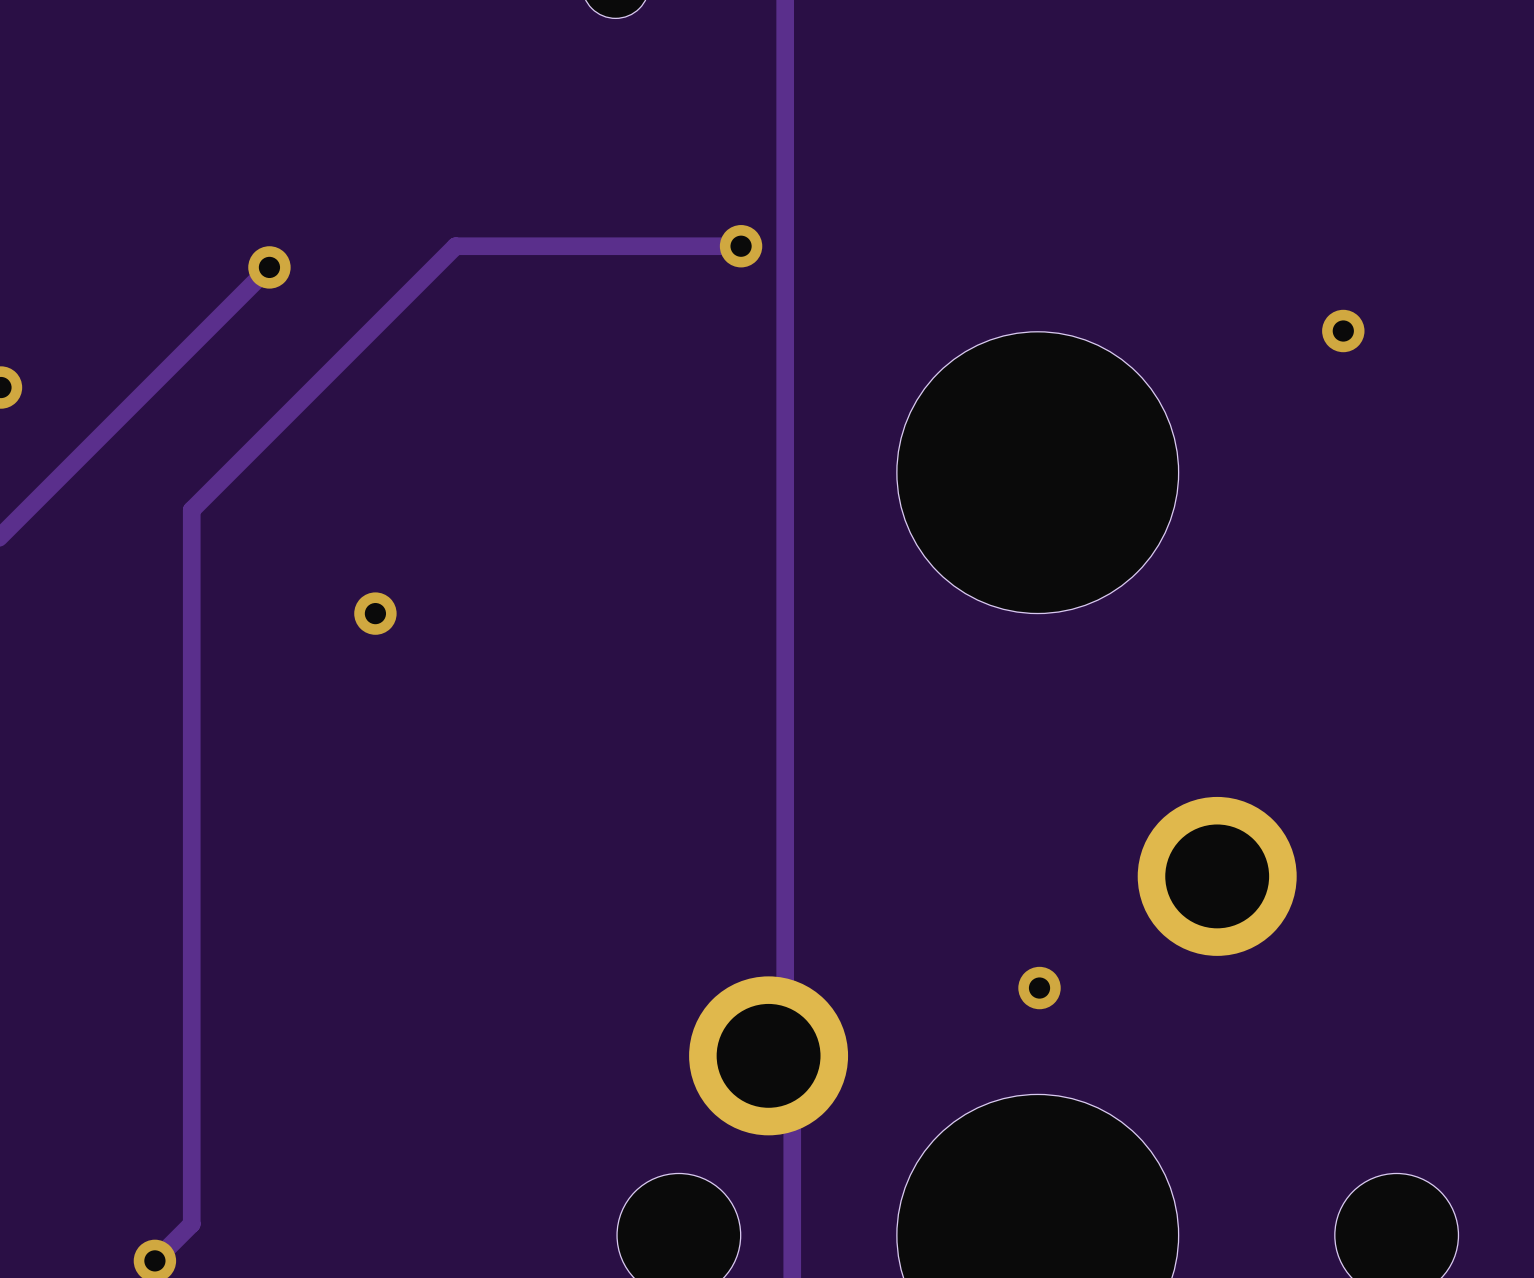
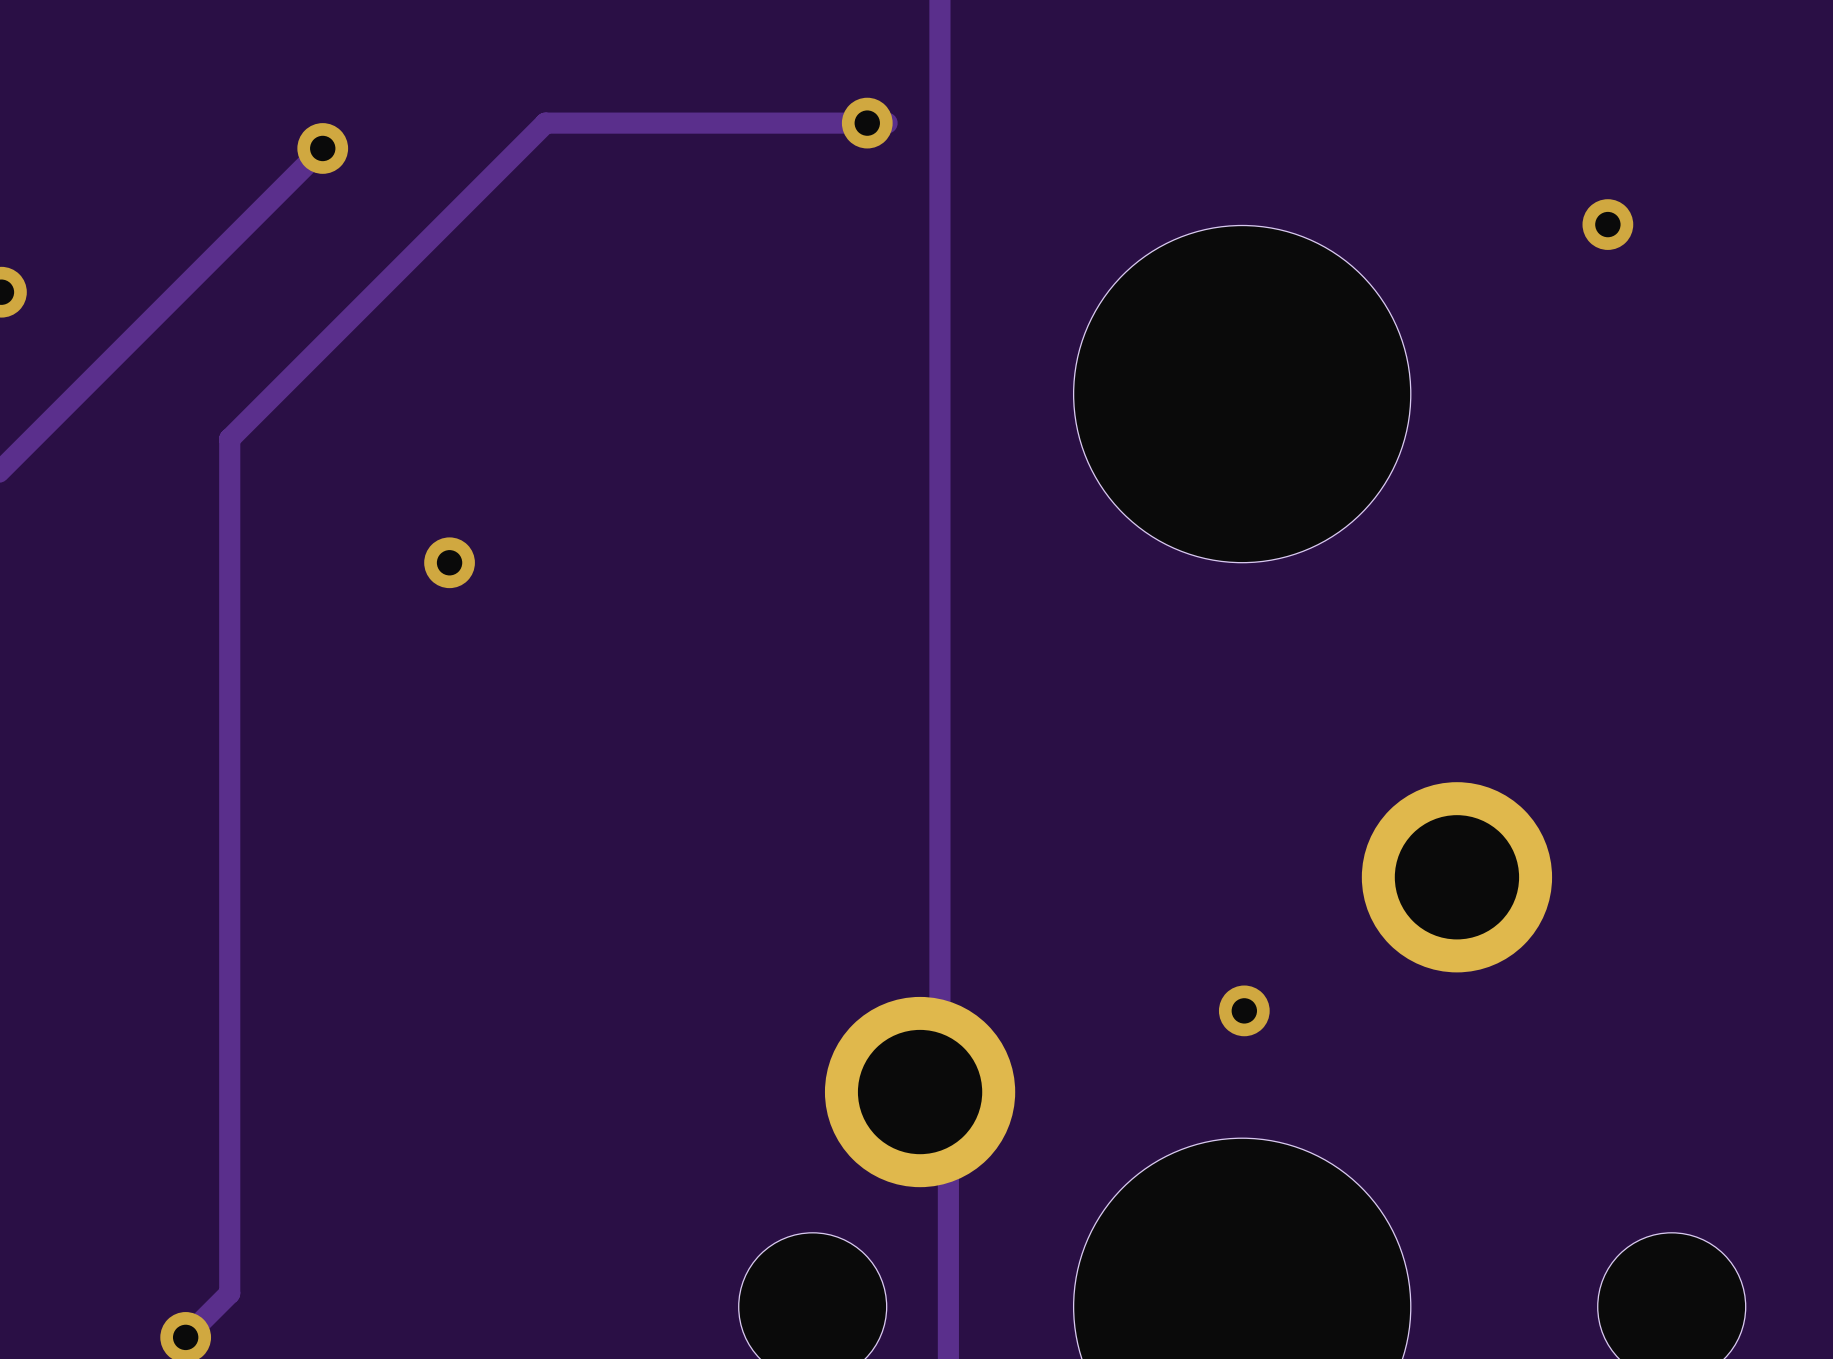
via position: (741, 246) -> (867, 123)

